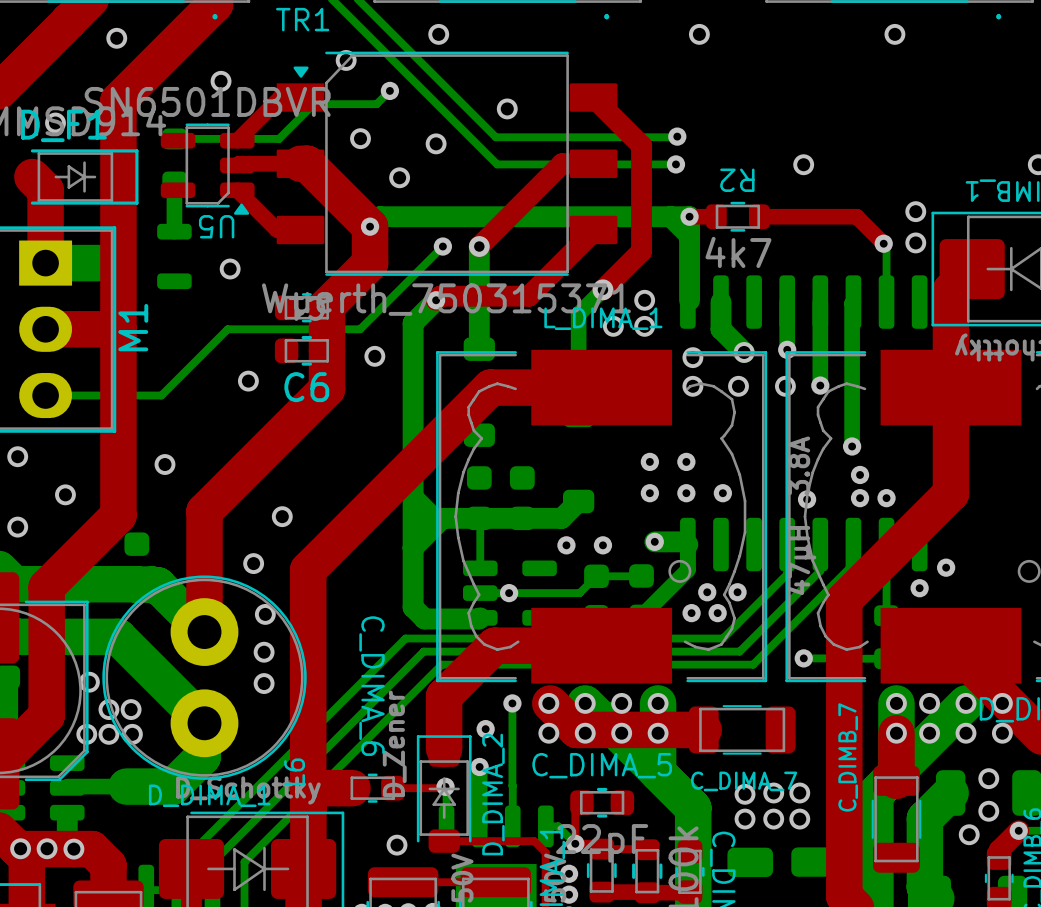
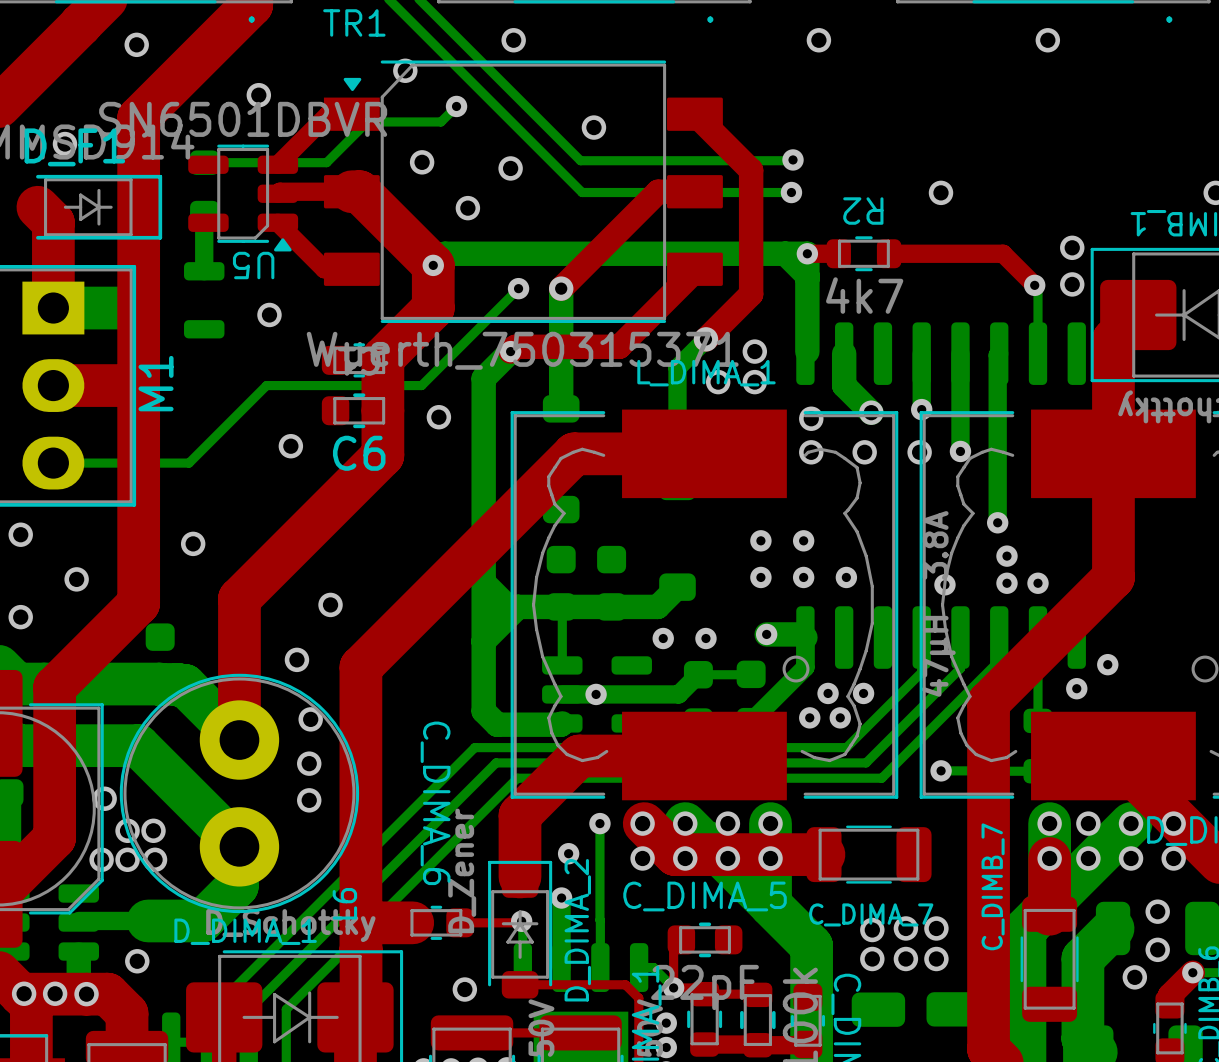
bottom track width: thin (596, 576) (579, 593) (480, 593) -> thick (698, 674) (678, 694) (562, 694)
via: none -> (137, 961)

